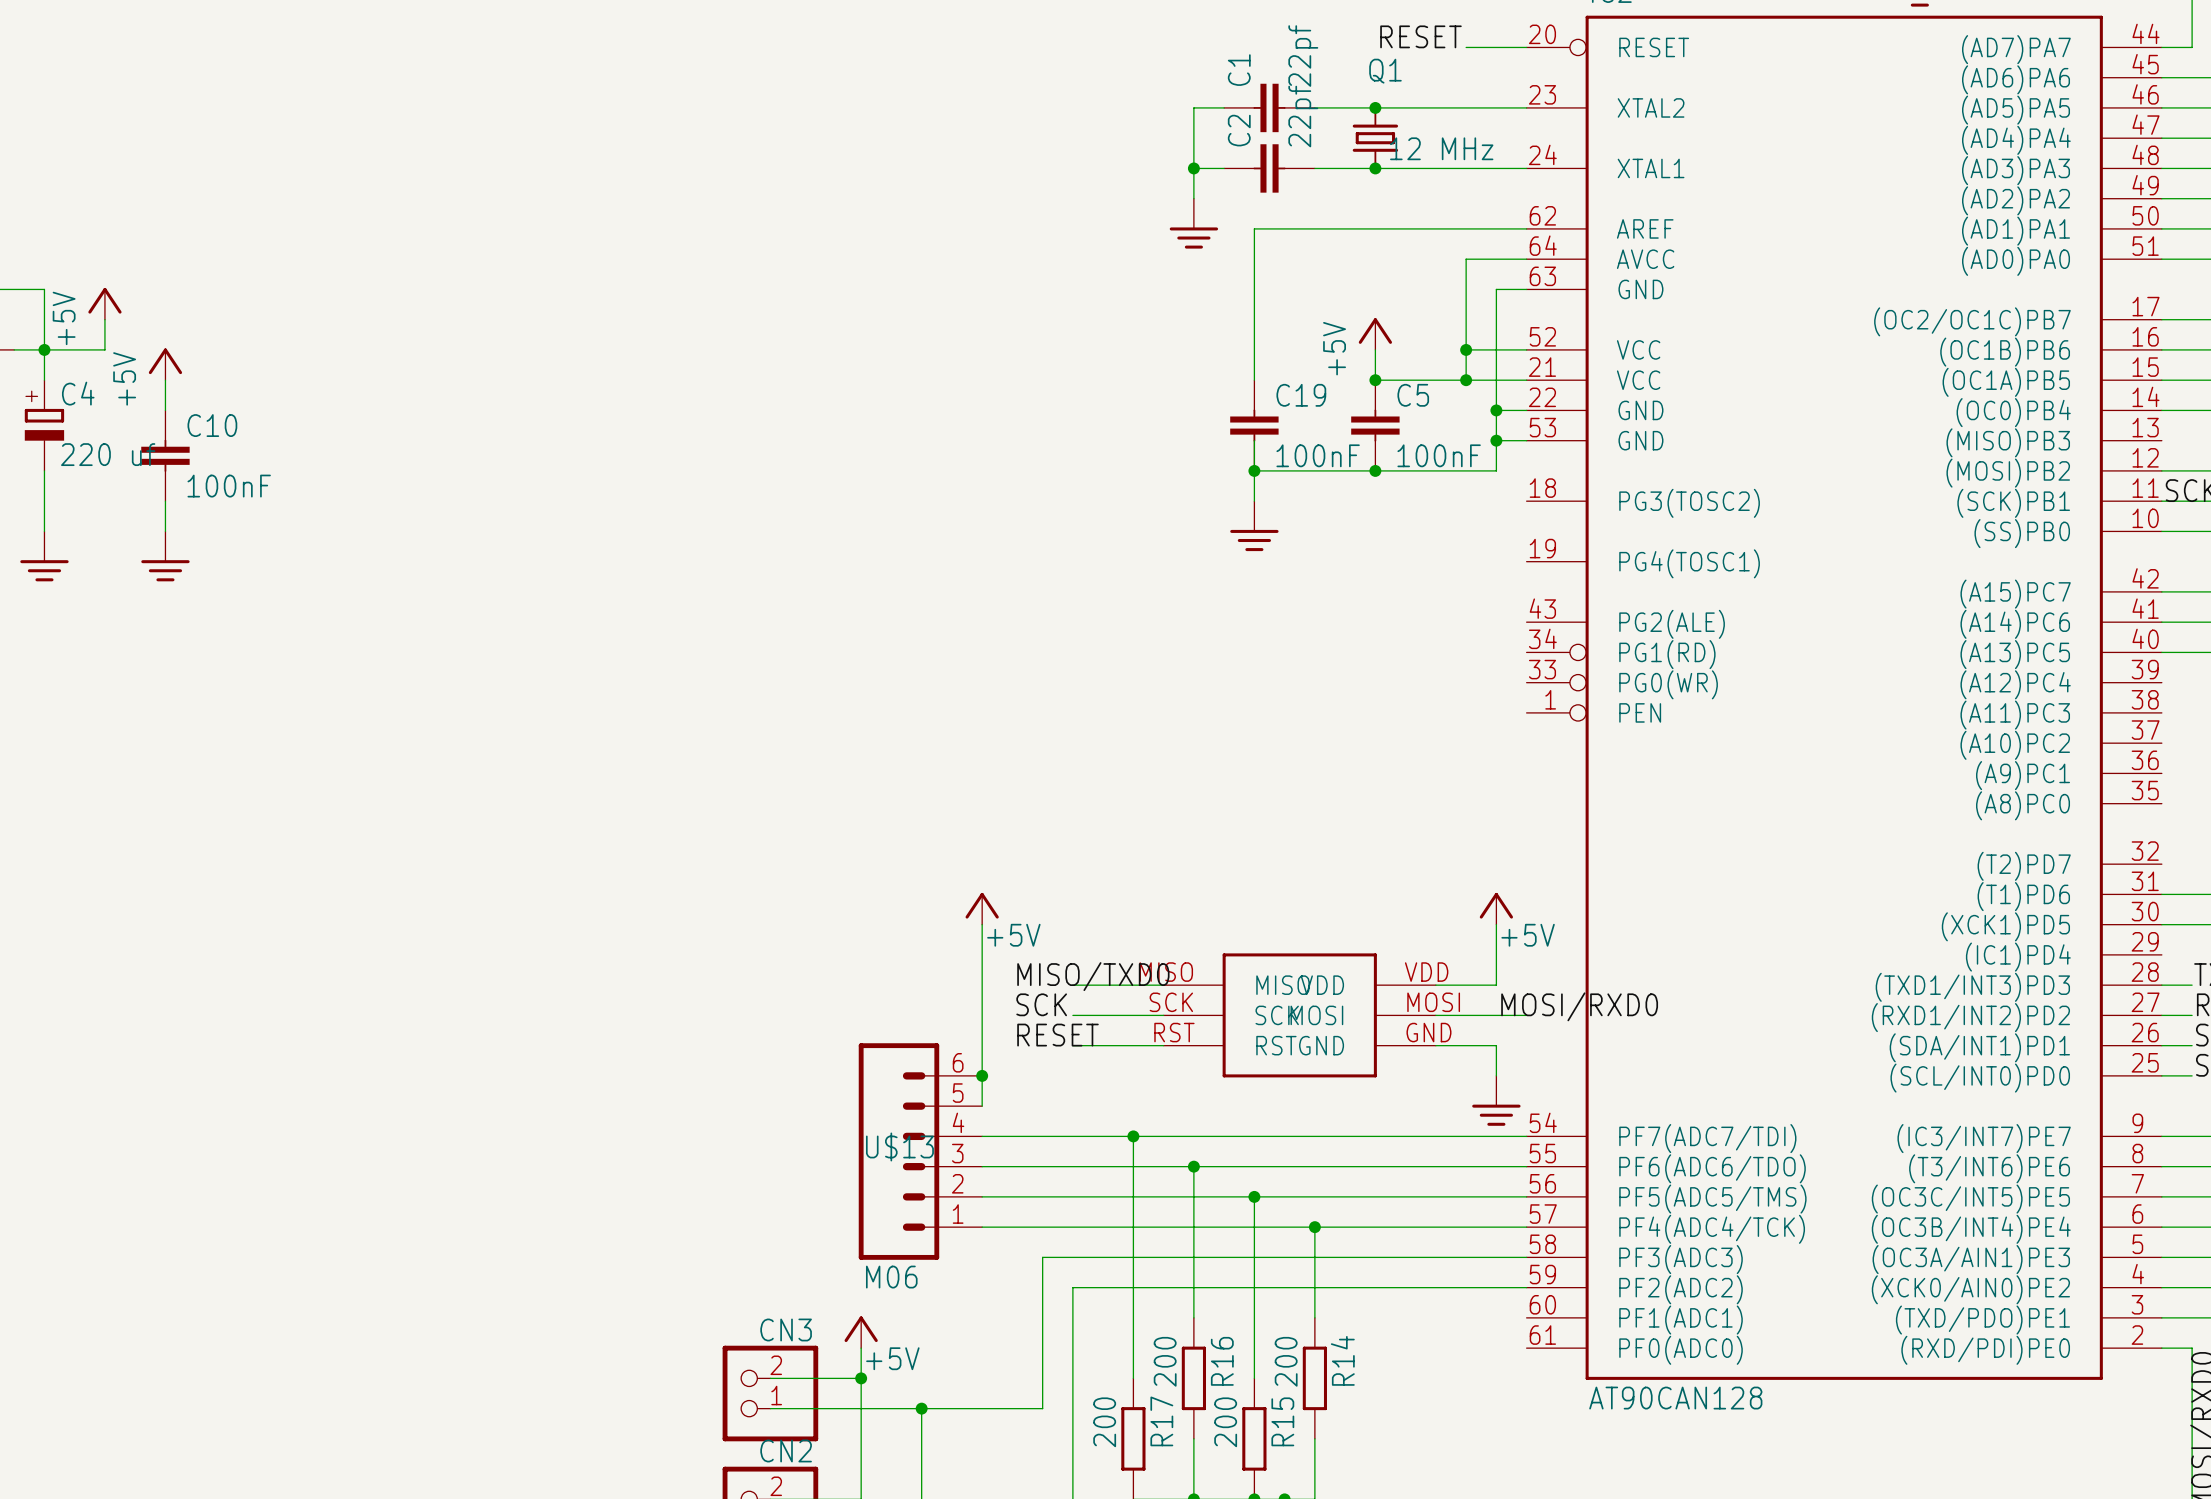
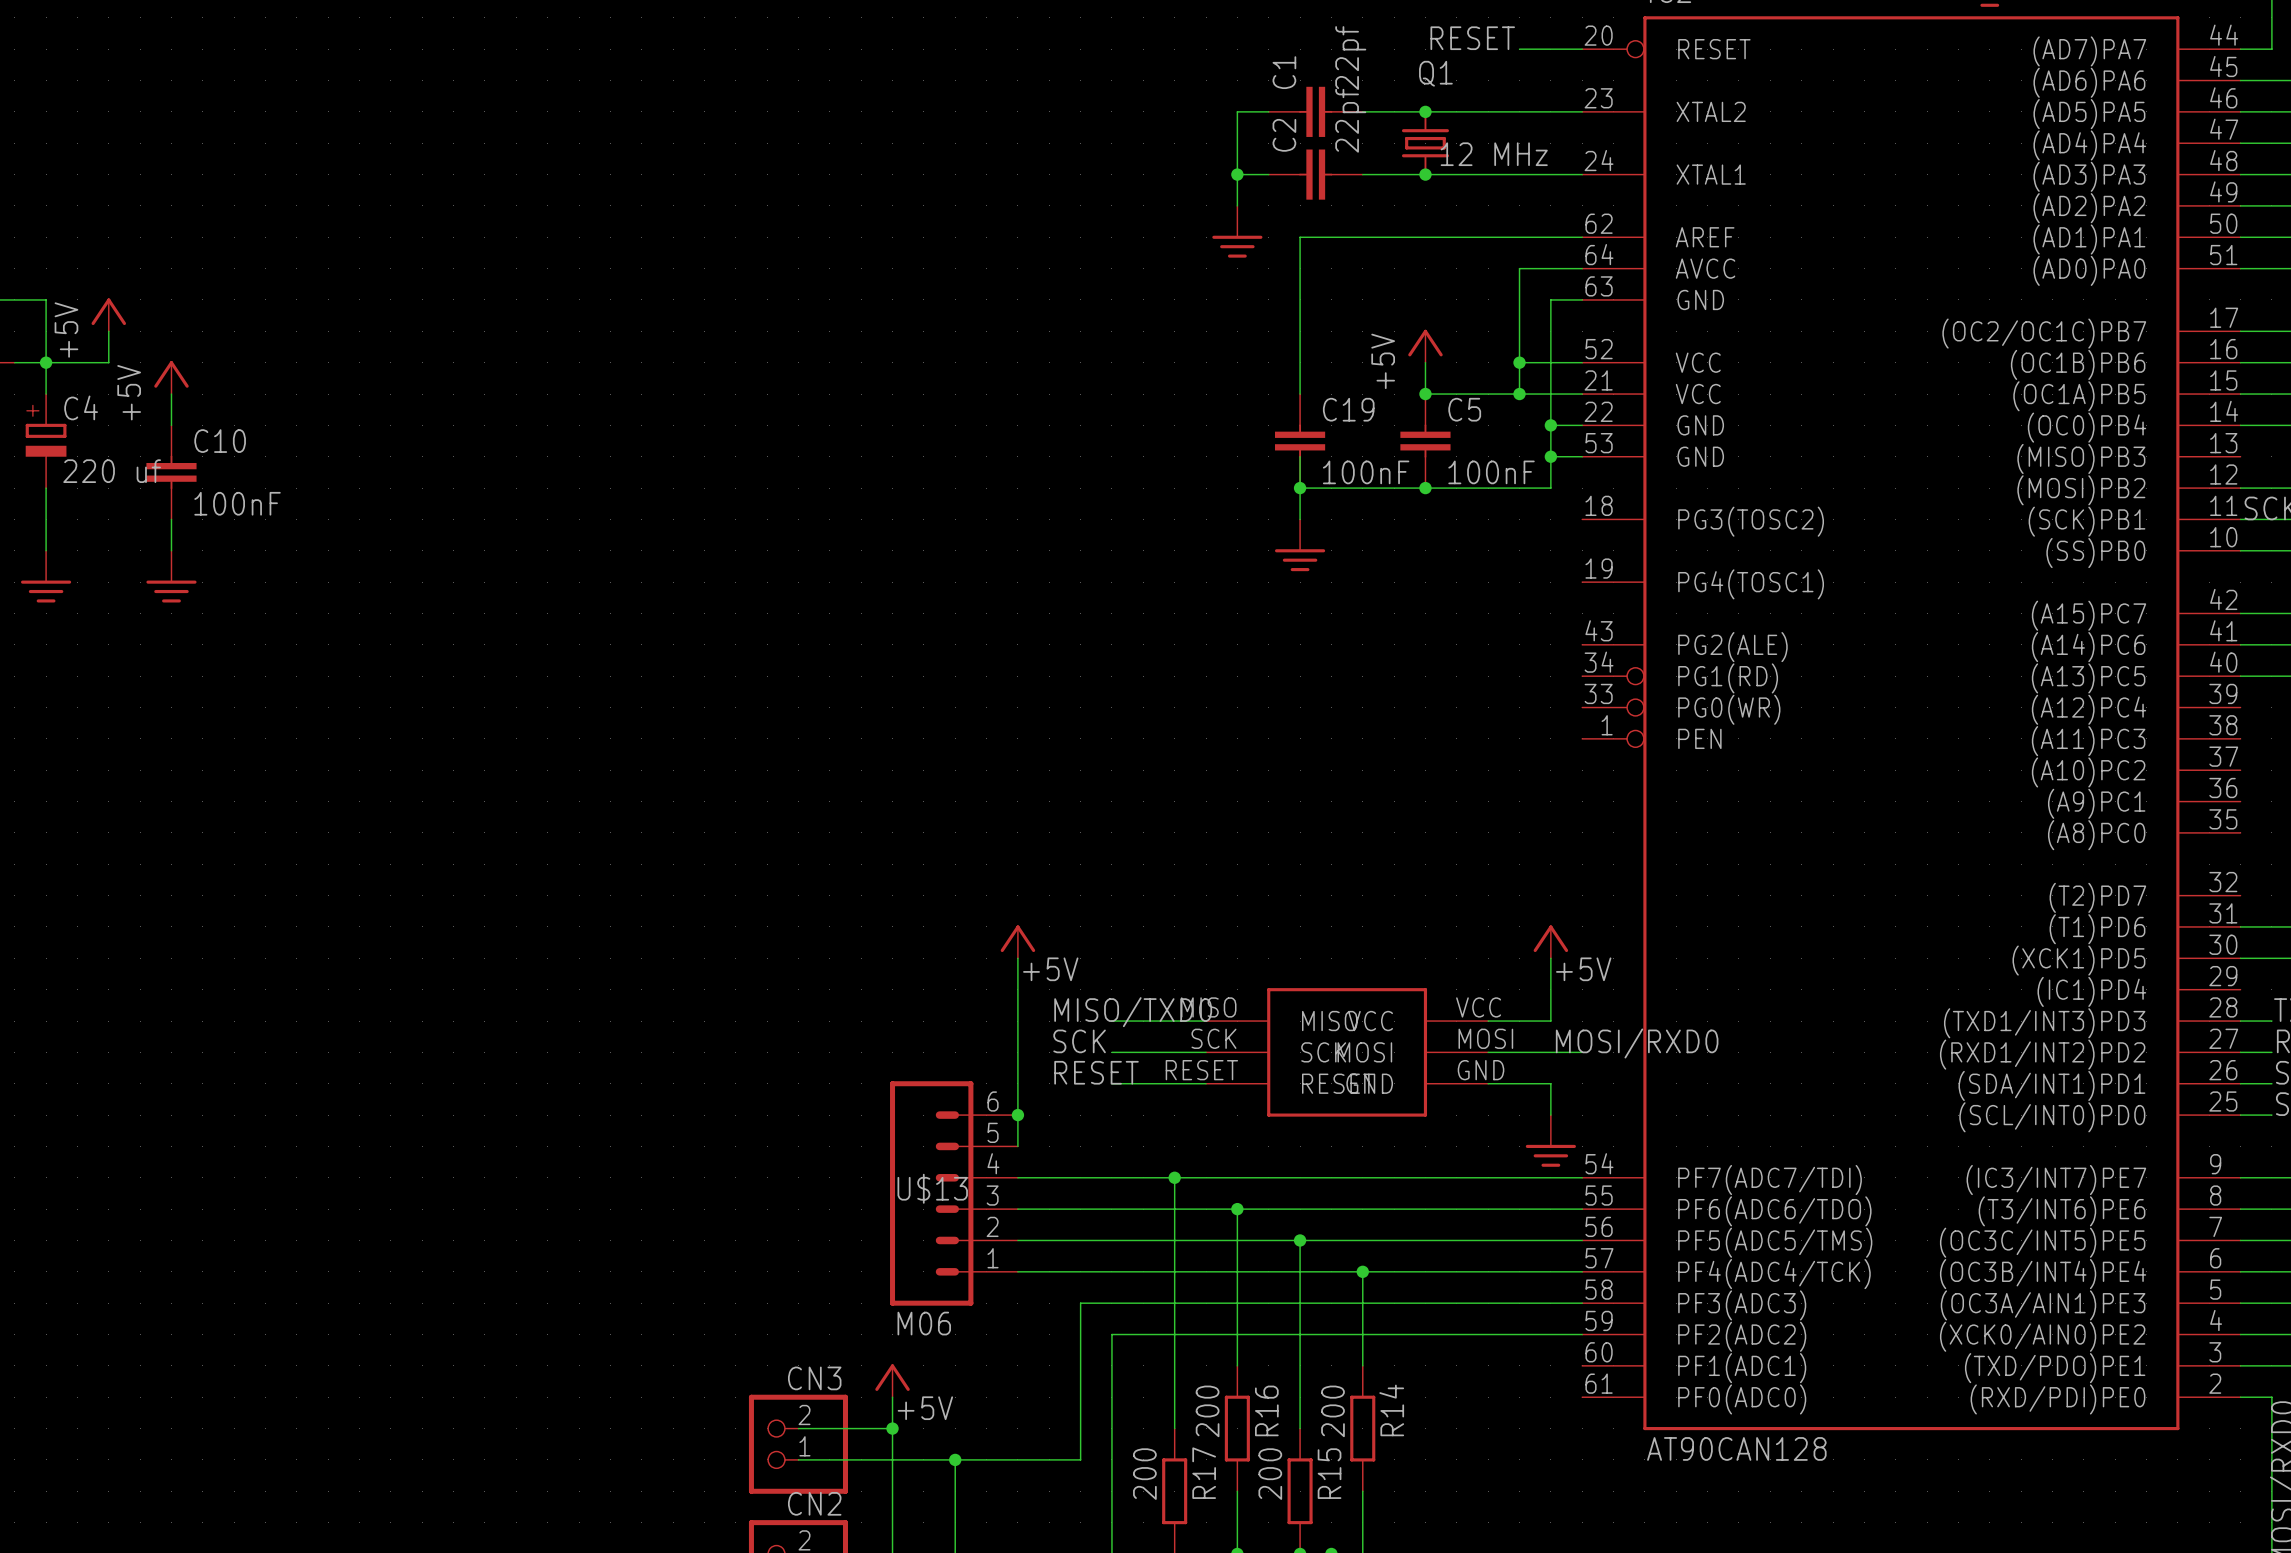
part pin number: VDD (1426, 972) -> VCC (1478, 1007)
part pin name: VDD (1322, 985) -> VCC (1370, 1021)
part pin number: RST (1174, 1032) -> RESET (1201, 1070)
part pin name: RST (1276, 1045) -> RESET (1338, 1083)

